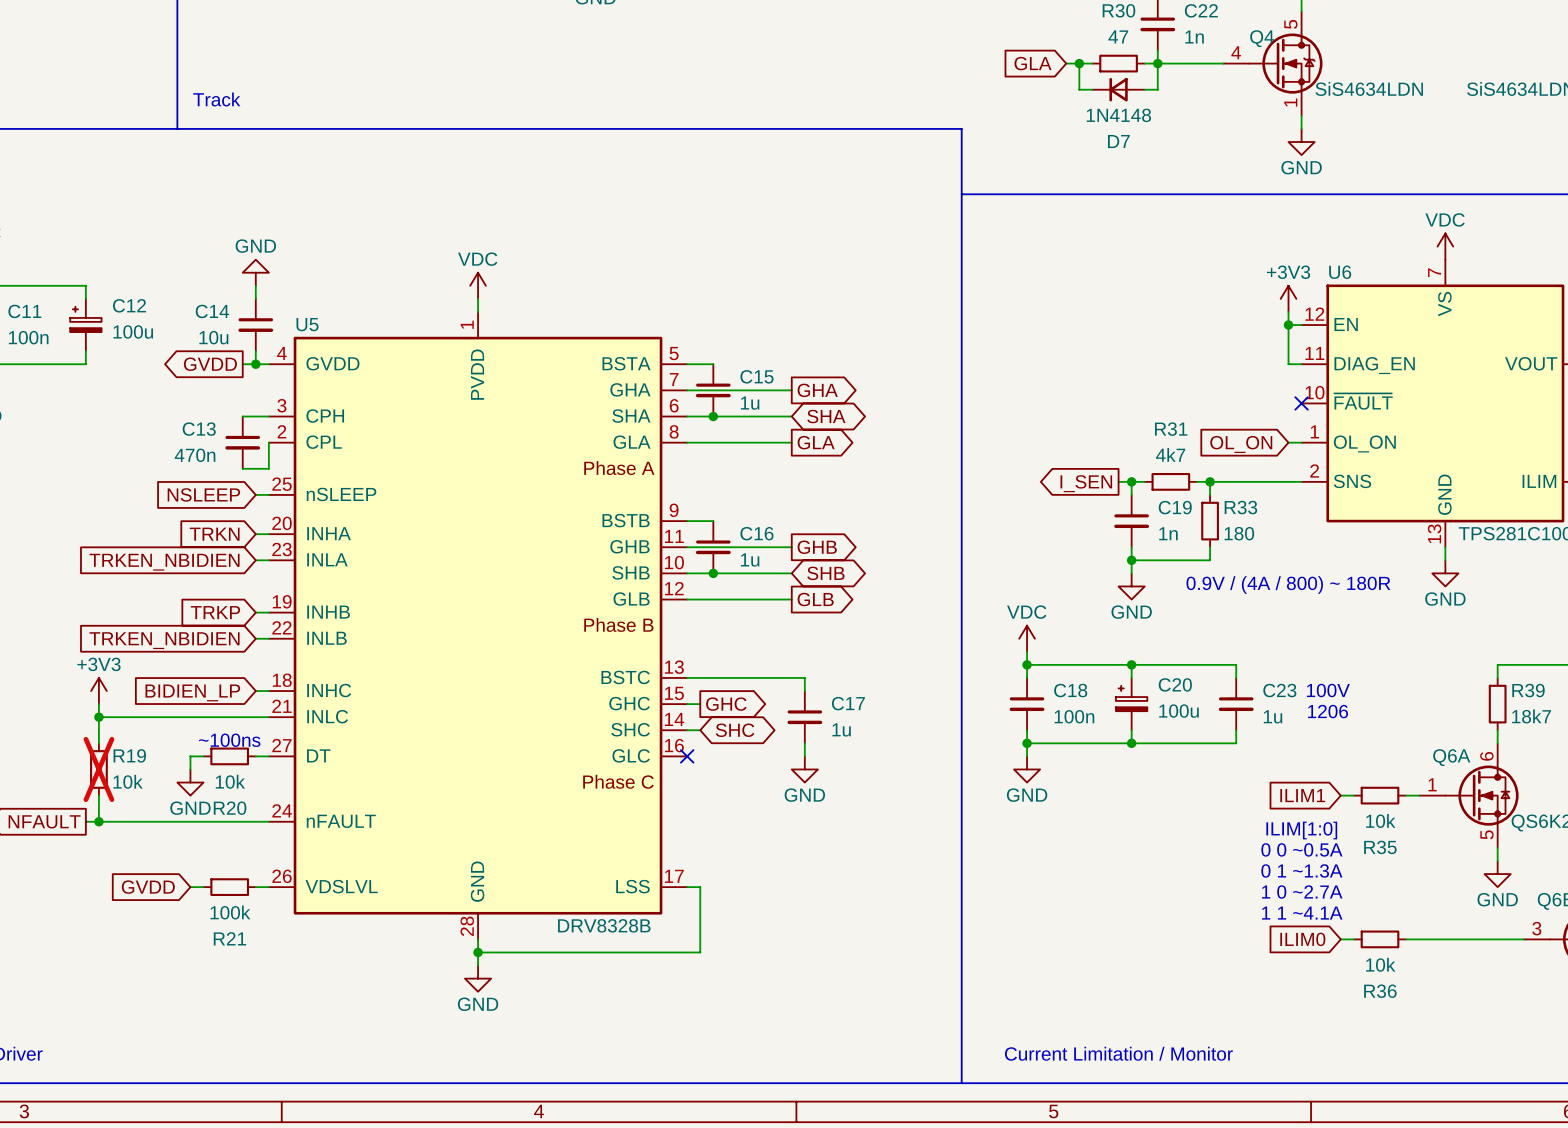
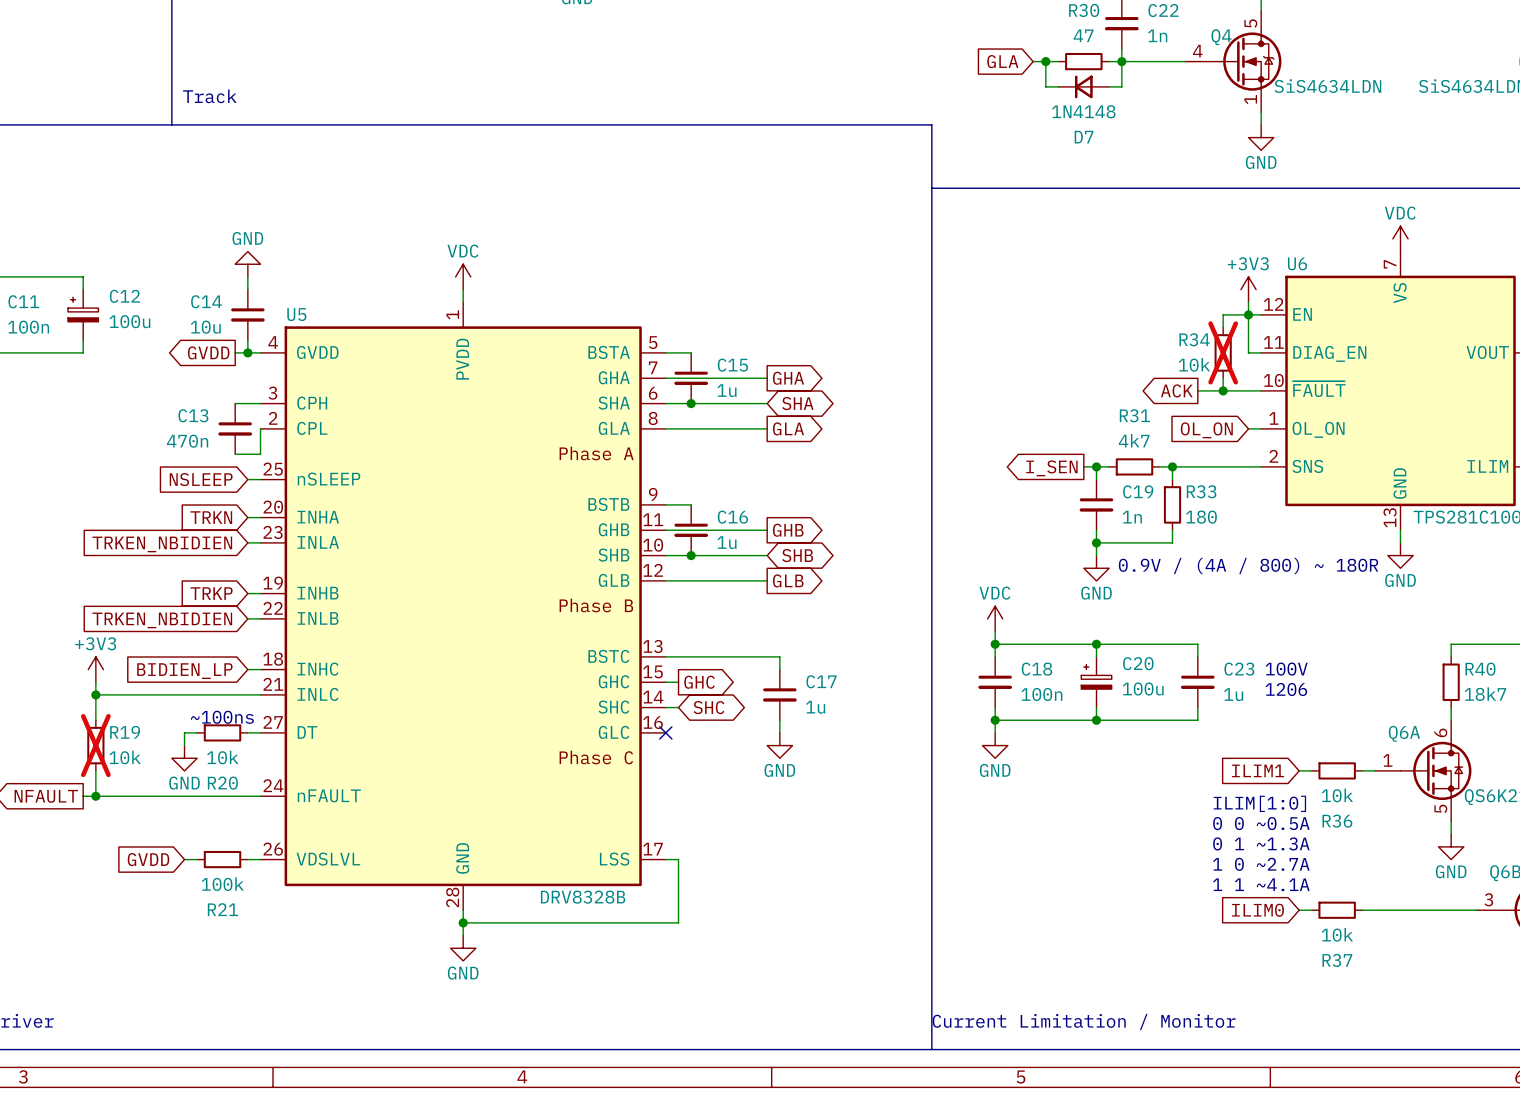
wire: none -> (1248, 314) (1223, 314) (1223, 327)
R34: none -> 10k (1223, 352)
wire: none -> (1223, 378) (1223, 390)
global label: none -> ACK (1176, 390)
wire: none -> (1197, 390) (1261, 390)
junction: none -> (1223, 390)
no-connect mark: (1301, 403) -> none
R39 name: R39 (1528, 690) -> R40 (1480, 669)
R35 name: R35 (1380, 847) -> R36 (1337, 821)
R36 name: R36 (1380, 991) -> R37 (1337, 960)

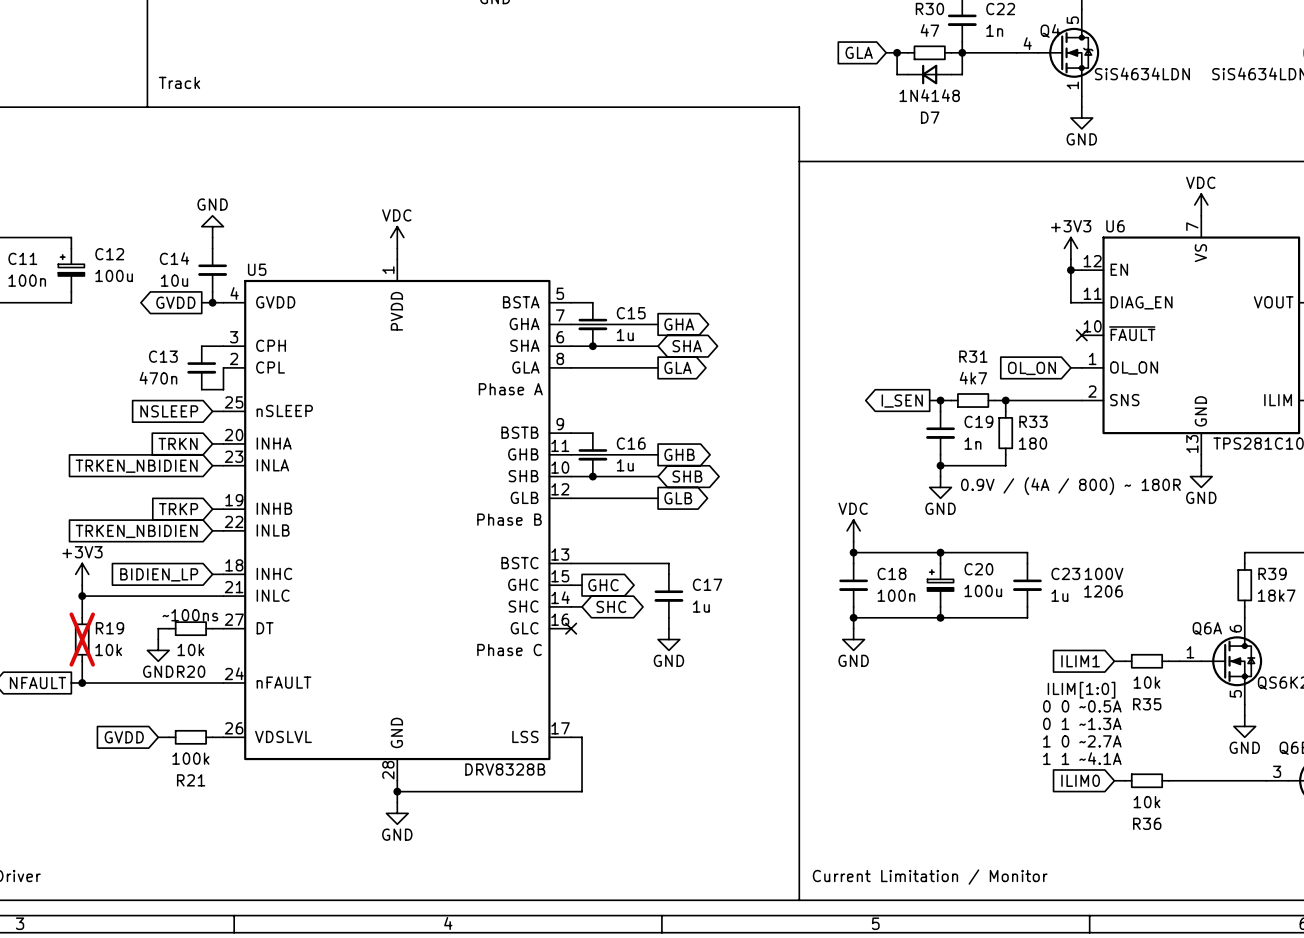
wire: (1248, 314) (1223, 314) (1223, 327) -> none
R34: 10k (1223, 352) -> none
wire: (1223, 378) (1223, 390) -> none
global label: ACK (1176, 390) -> none
wire: (1197, 390) (1261, 390) -> none
junction: (1223, 390) -> none
no-connect mark: none -> (1081, 335)
R40 name: R40 (1480, 669) -> R39 (1272, 573)
R36 name: R36 (1337, 821) -> R35 (1147, 704)
R37 name: R37 (1337, 960) -> R36 (1147, 823)

